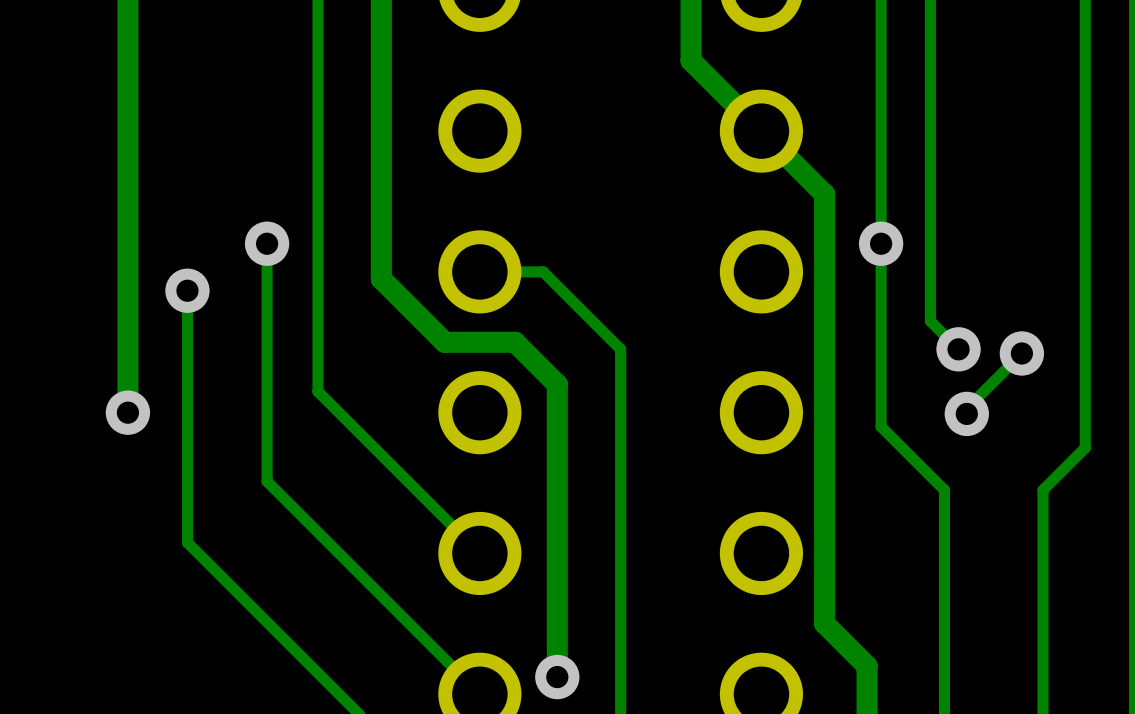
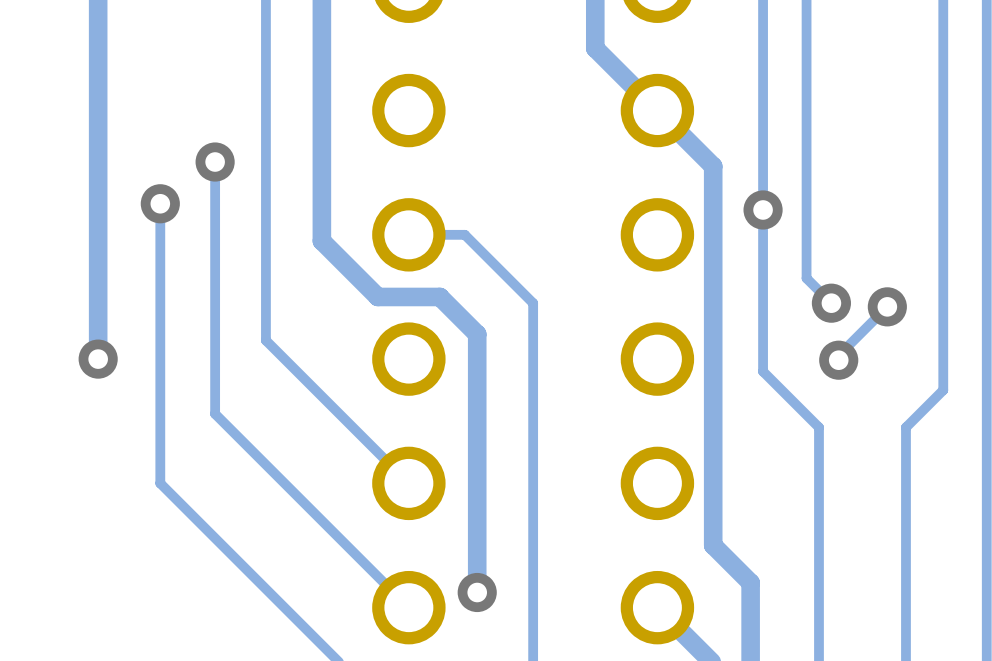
via: none -> (215, 162)
via: none -> (160, 203)
track: (267, 243) (267, 481) -> (215, 162) (215, 413) (221, 419)
via: (267, 243) -> none
track: (187, 290) (187, 542) (198, 553) -> (160, 203) (160, 483)
via: (187, 290) -> none

